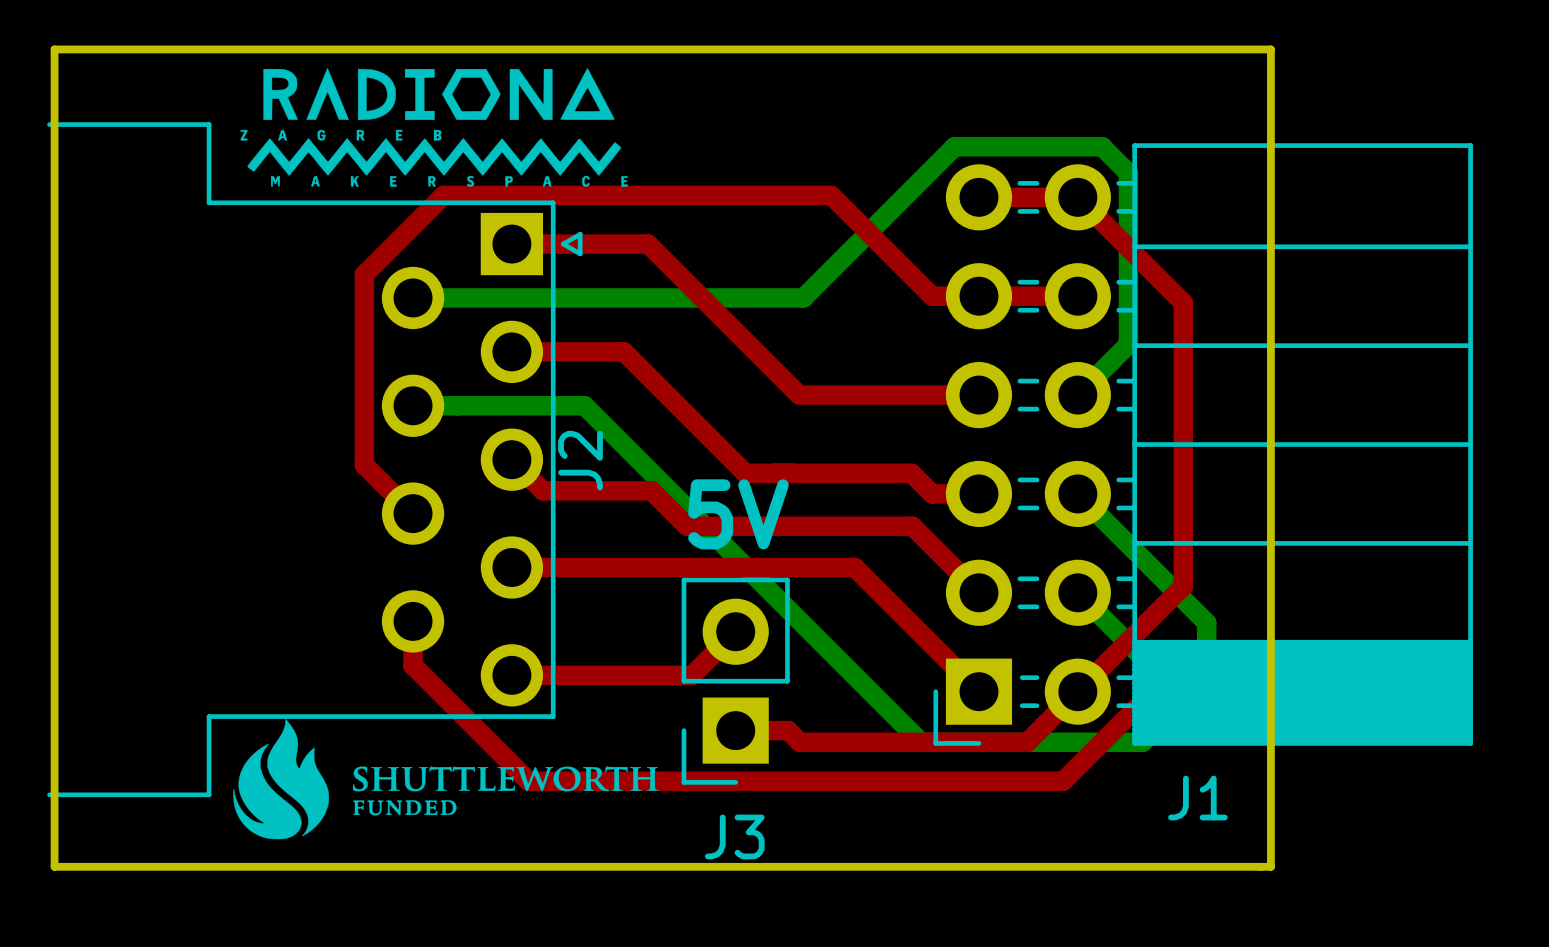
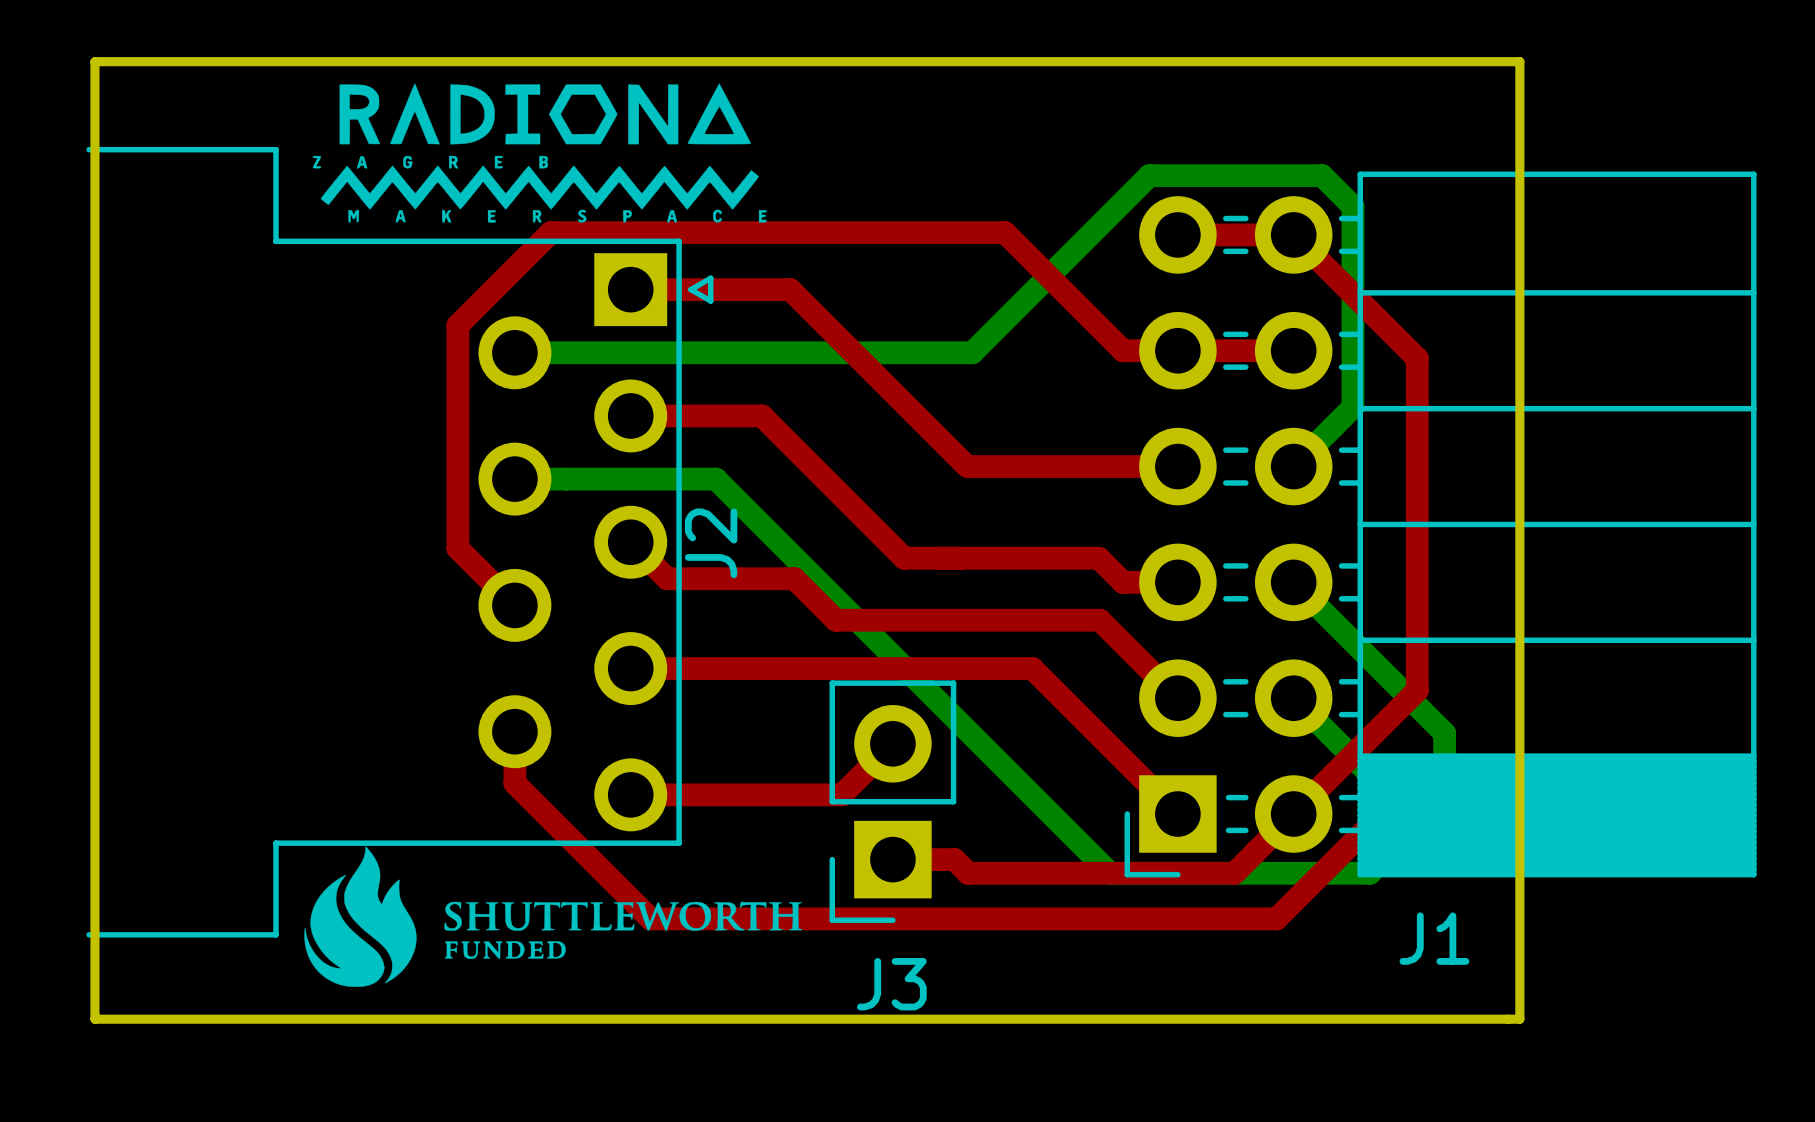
text: 5V (738, 514) -> none

